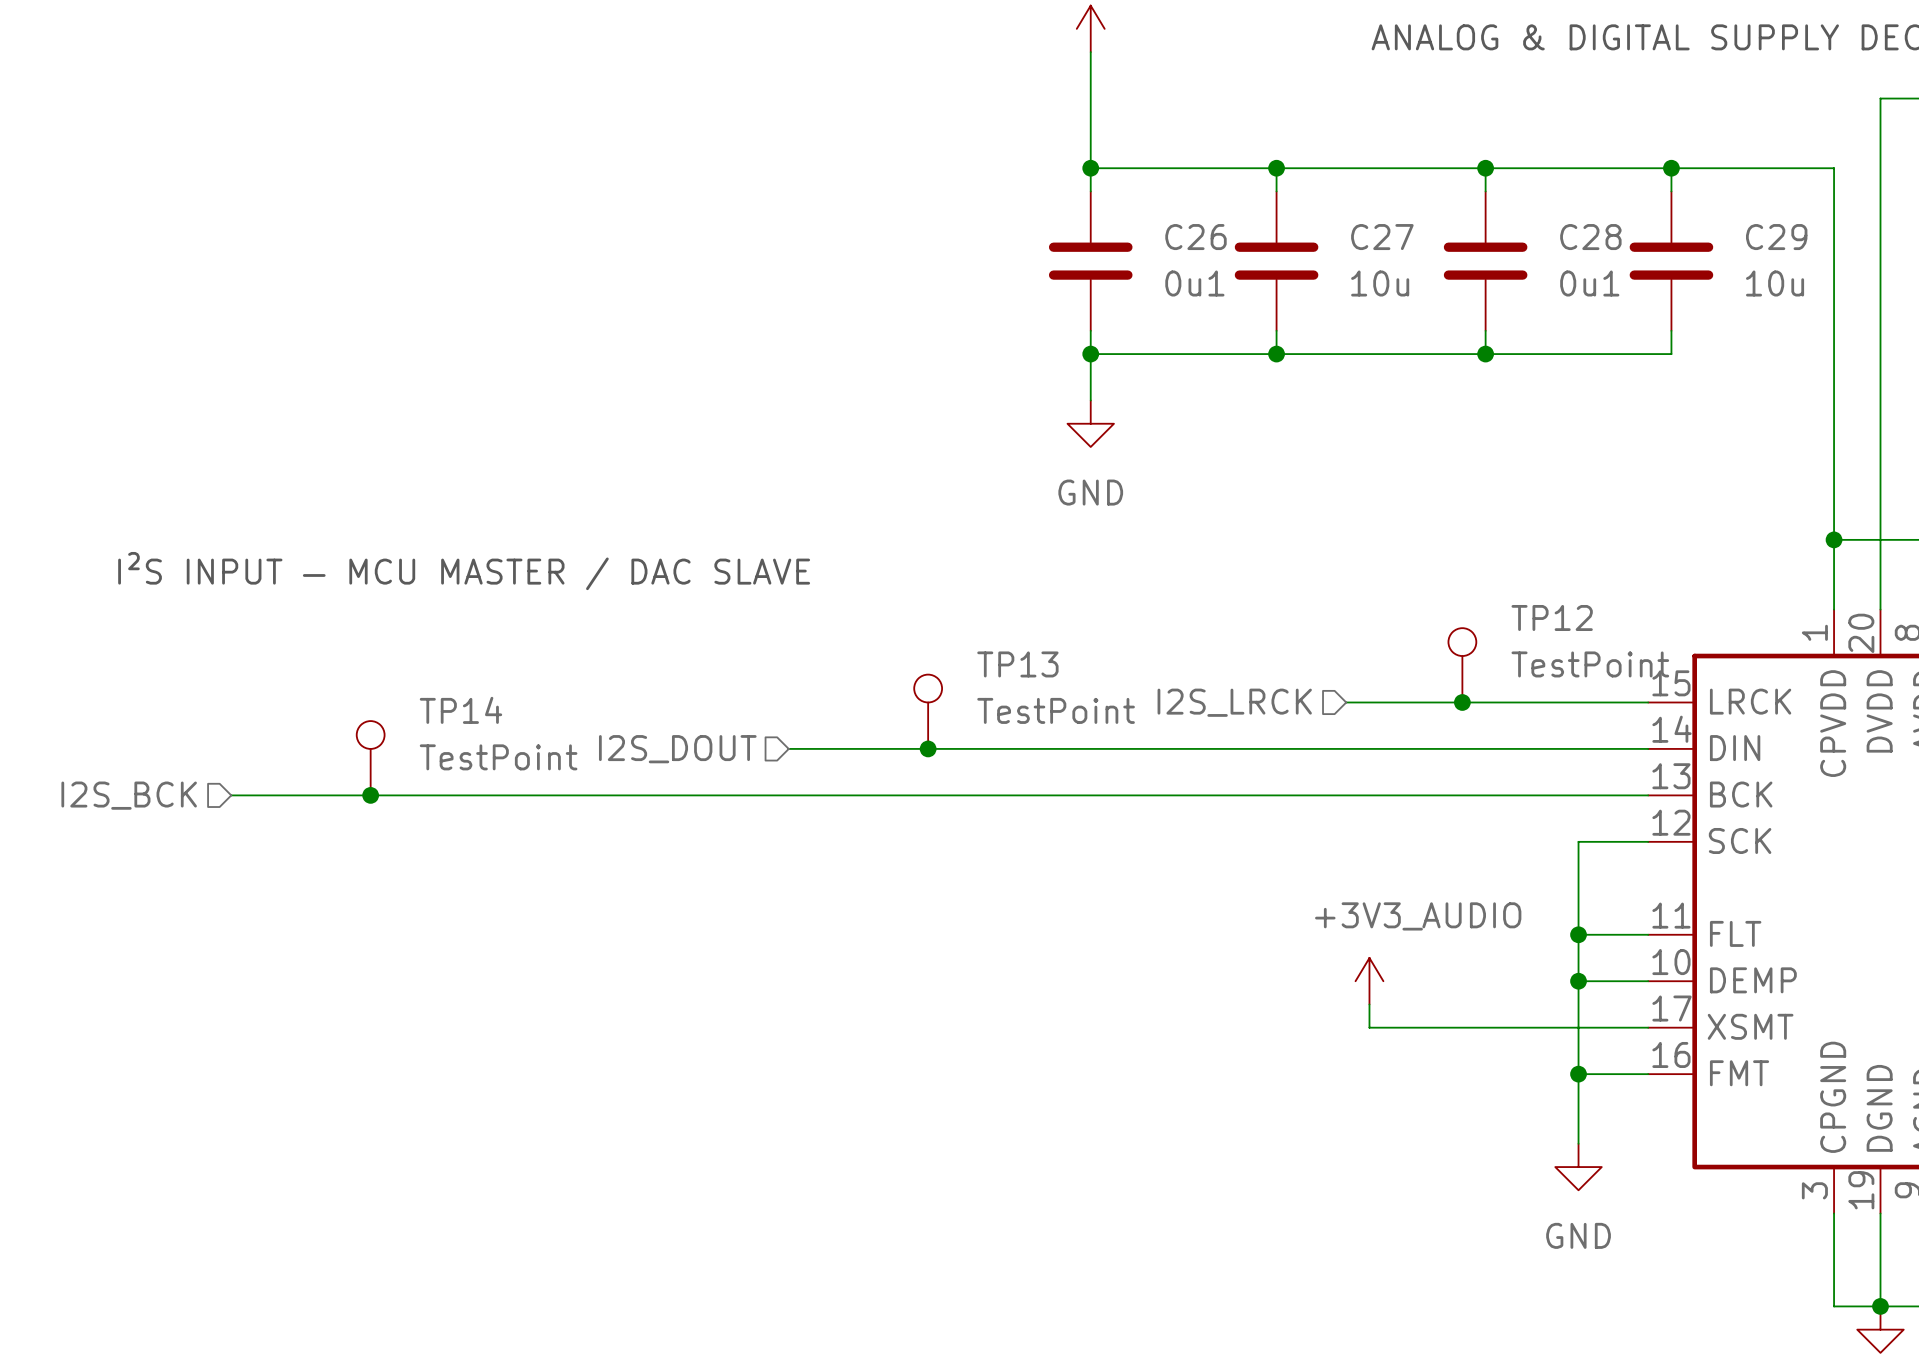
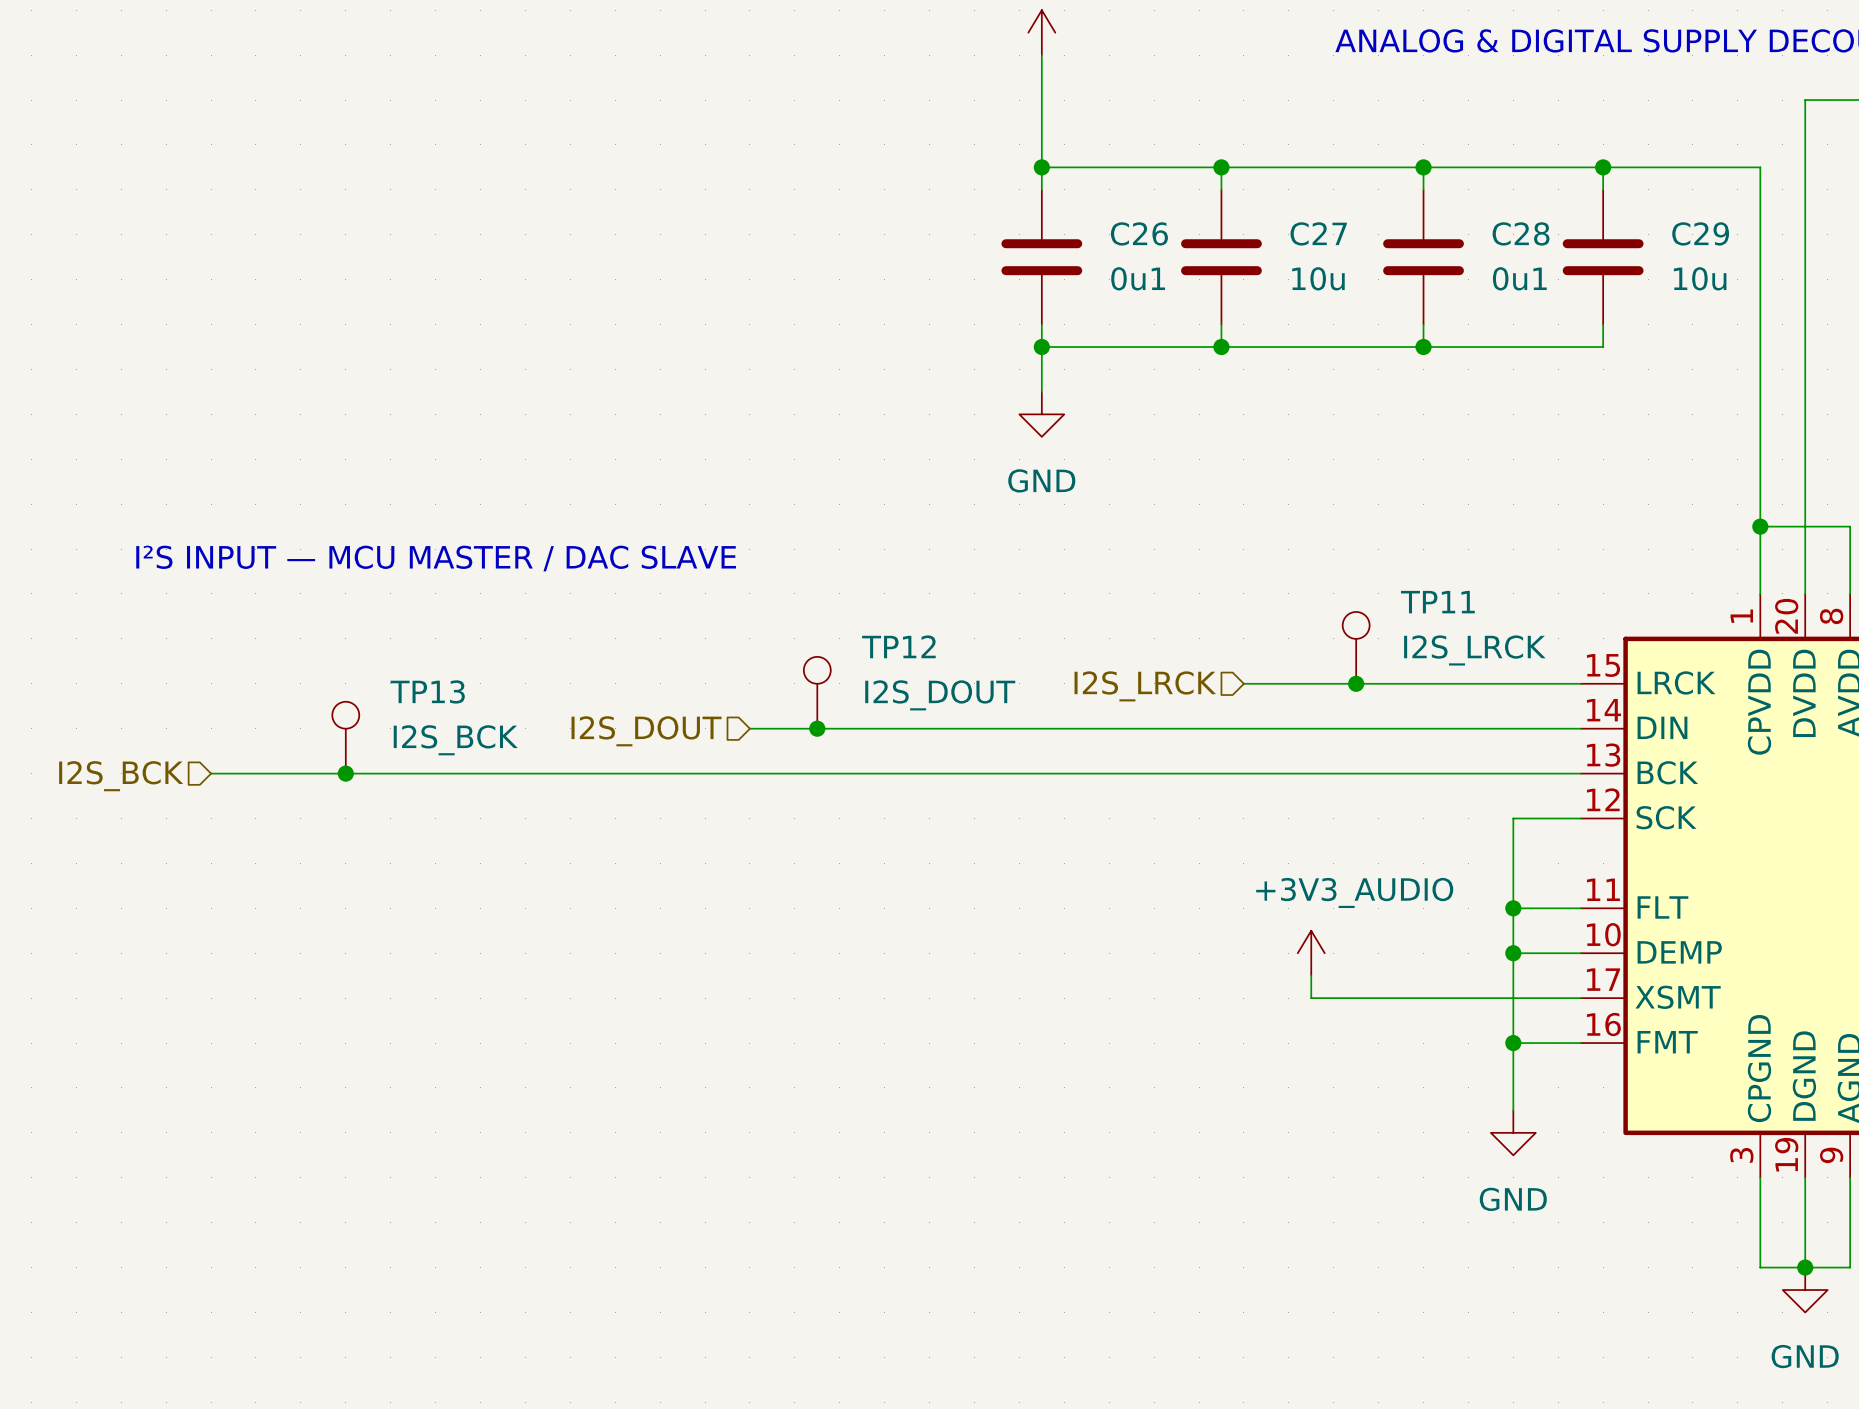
TP12 value: TestPoint (1590, 664) -> I2S_DOUT (940, 695)
TP11: none -> I2S_LRCK (1356, 647)
TP12 position: (1462, 665) -> (817, 692)
hierarchical label position: I2S_LRCK (1234, 702) -> I2S_LRCK (1145, 686)
wire: none -> (1243, 683) (1288, 683)
junction position: (1462, 702) -> (1356, 683)
TP14 name: TP14 (460, 710) -> TP13 (427, 691)
TP13: TestPoint (928, 711) -> none
junction position: (928, 748) -> (817, 728)
TP14 value: TestPoint (498, 757) -> I2S_BCK (455, 740)

